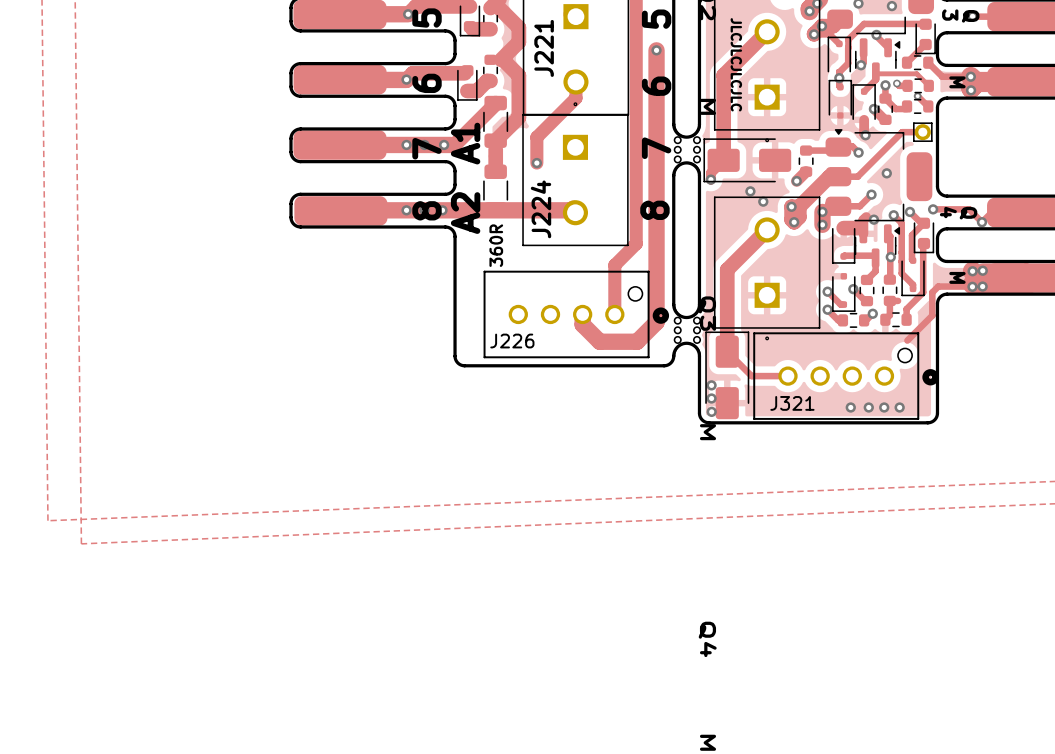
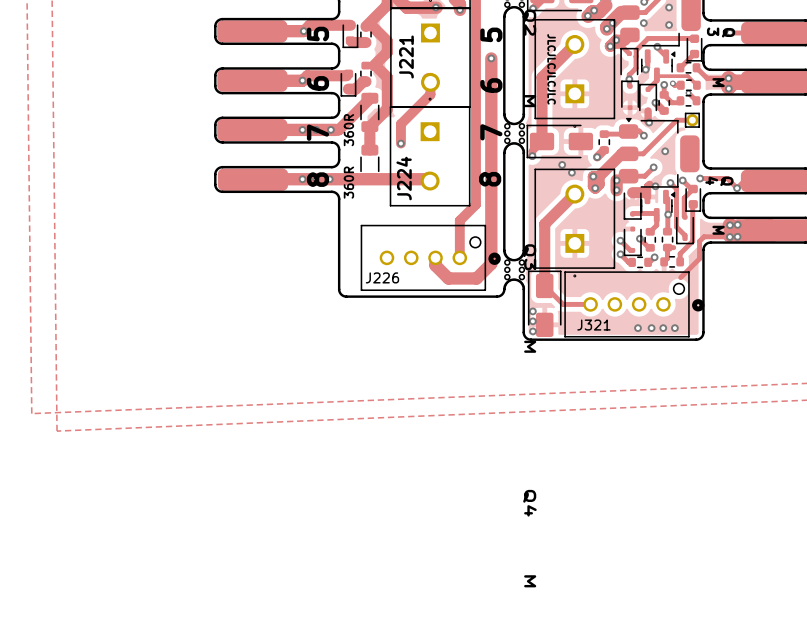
text: A1 (465, 143) -> 360R (348, 130)
text: A2 (465, 213) -> 360R (348, 182)
text: 360R (496, 245) -> none

